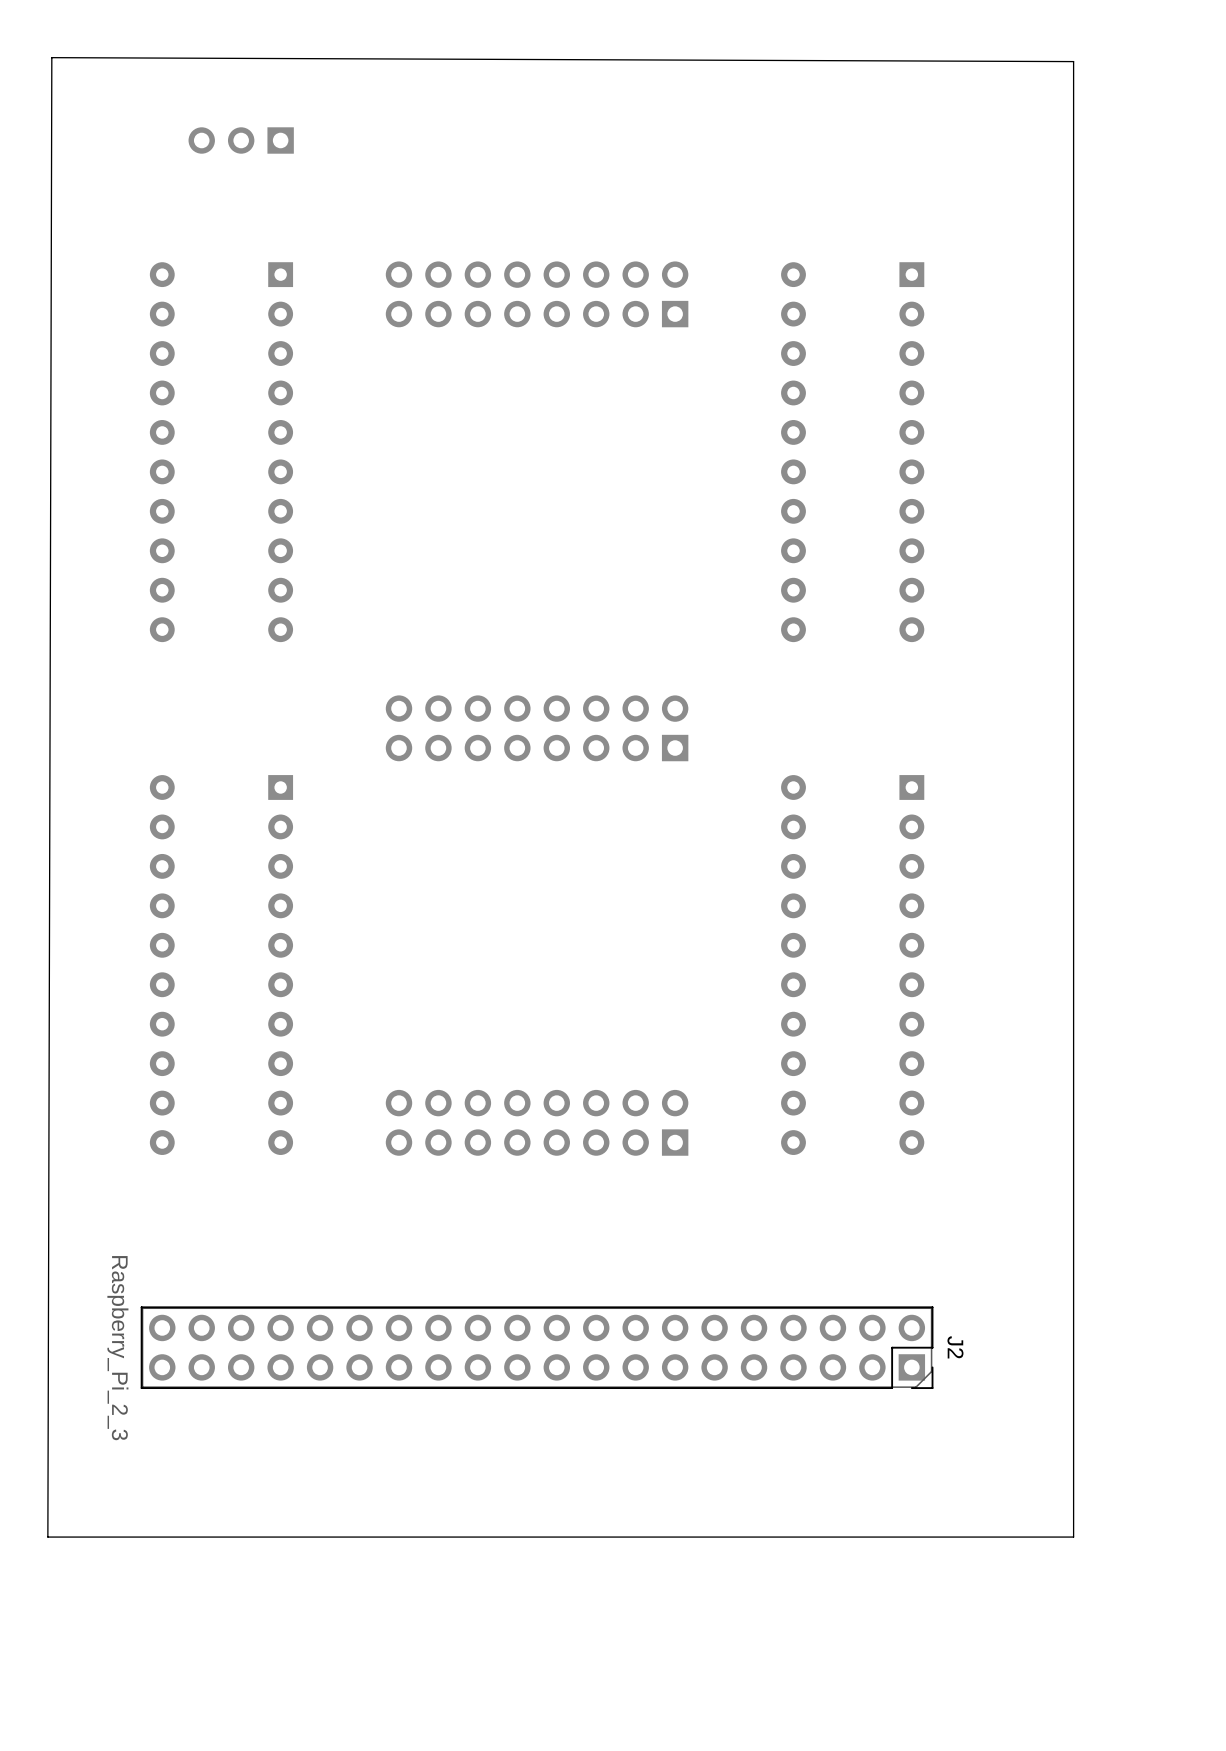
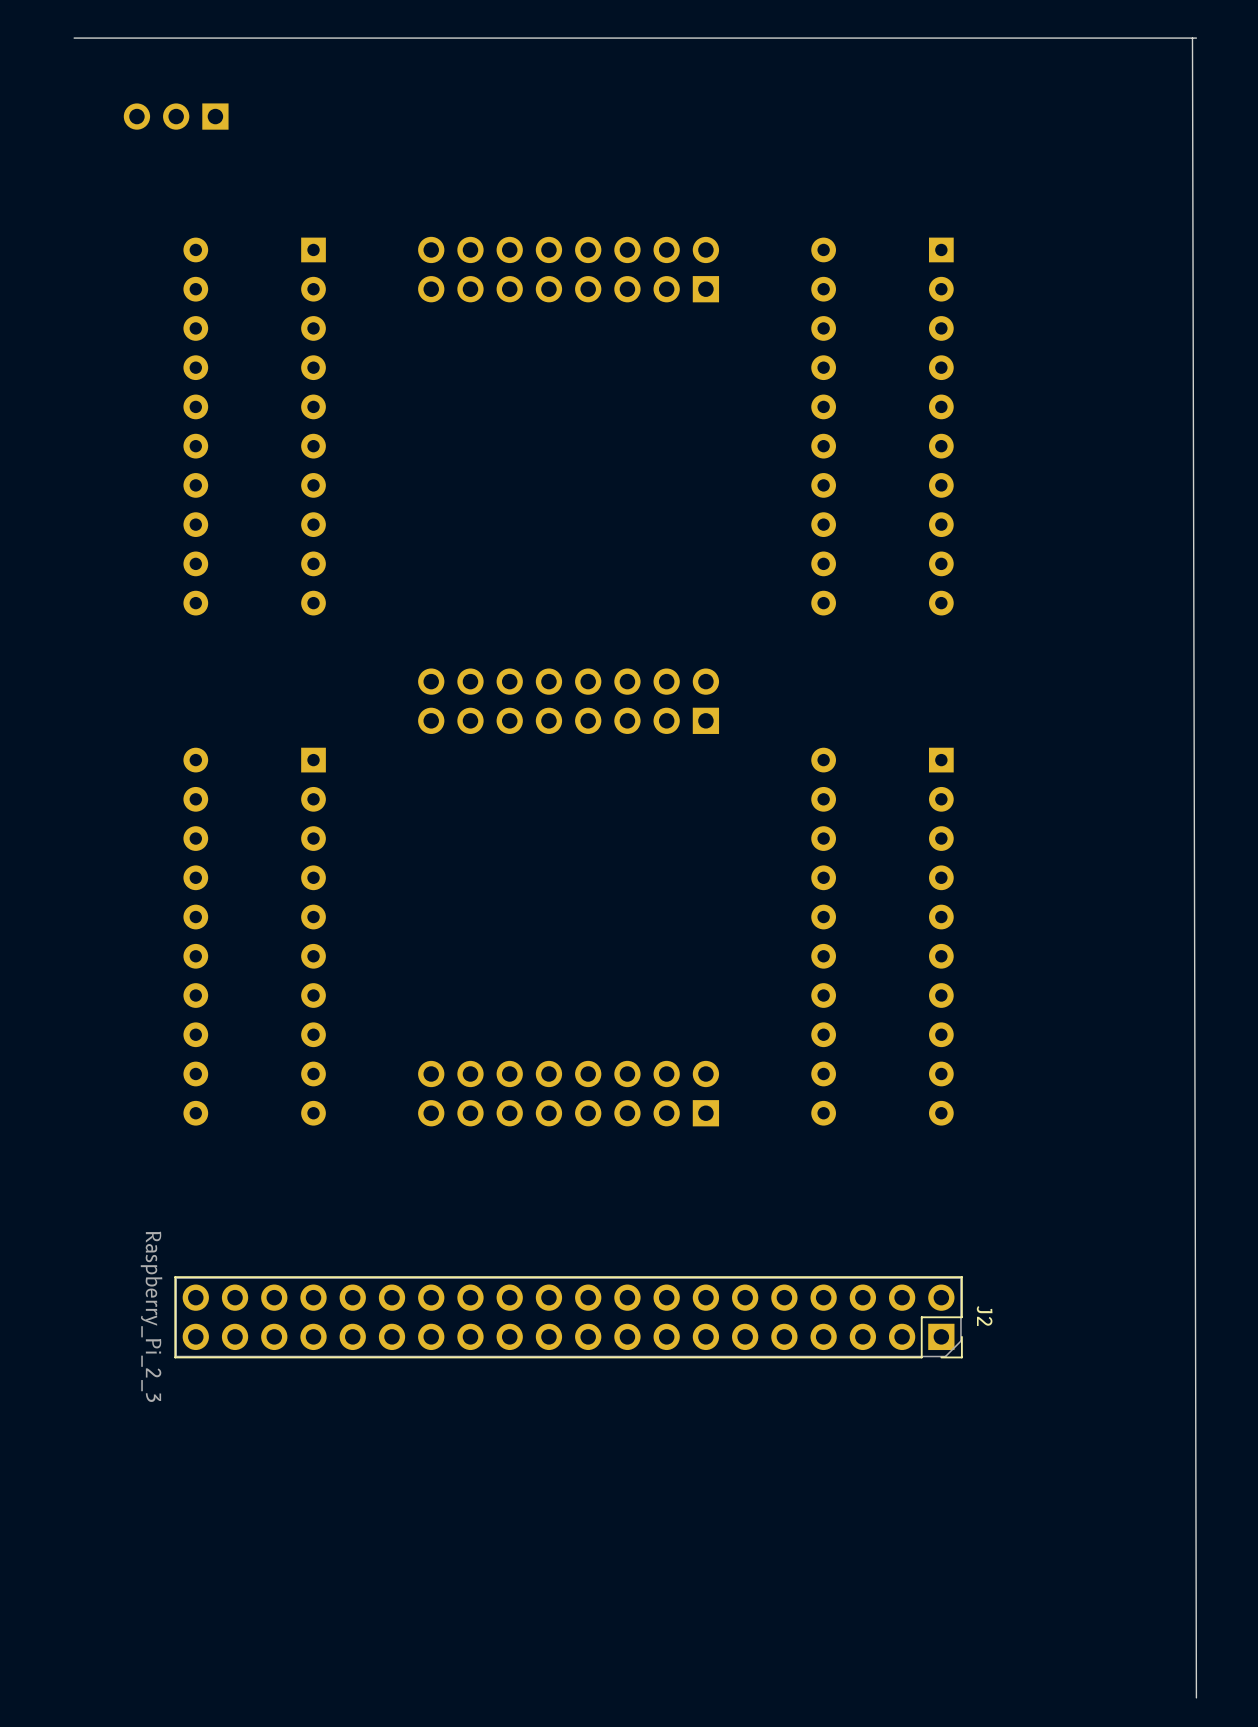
board edge: (51, 57) (1073, 61) (1073, 1537) (47, 1537) (51, 57) -> none
board edge: none -> (1192, 38) (1196, 1697)
board edge: none -> (1196, 38) (74, 38)
part position: (241, 140) -> (176, 116)

